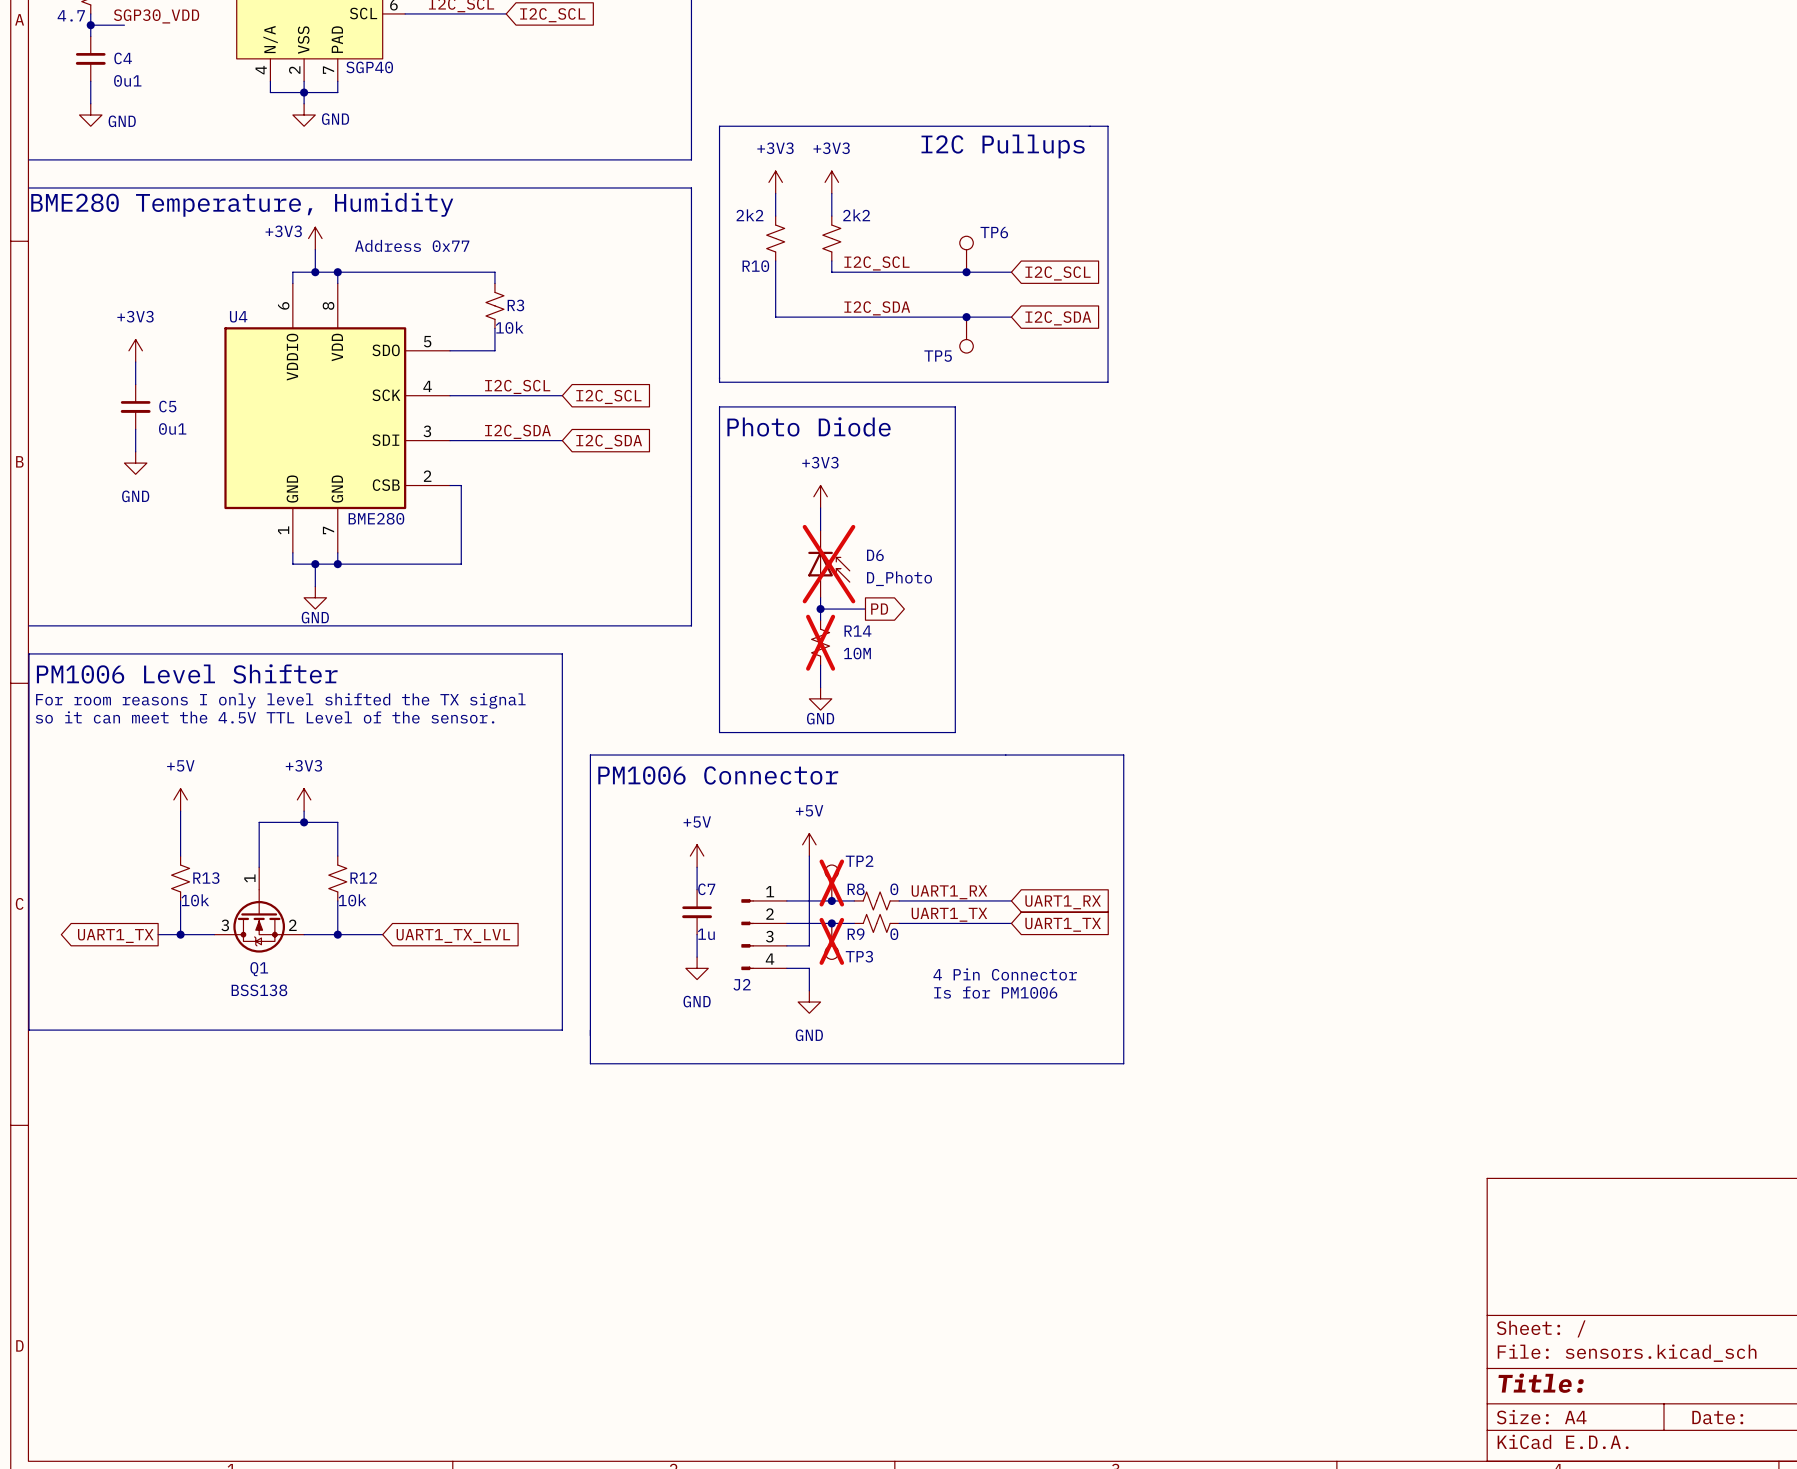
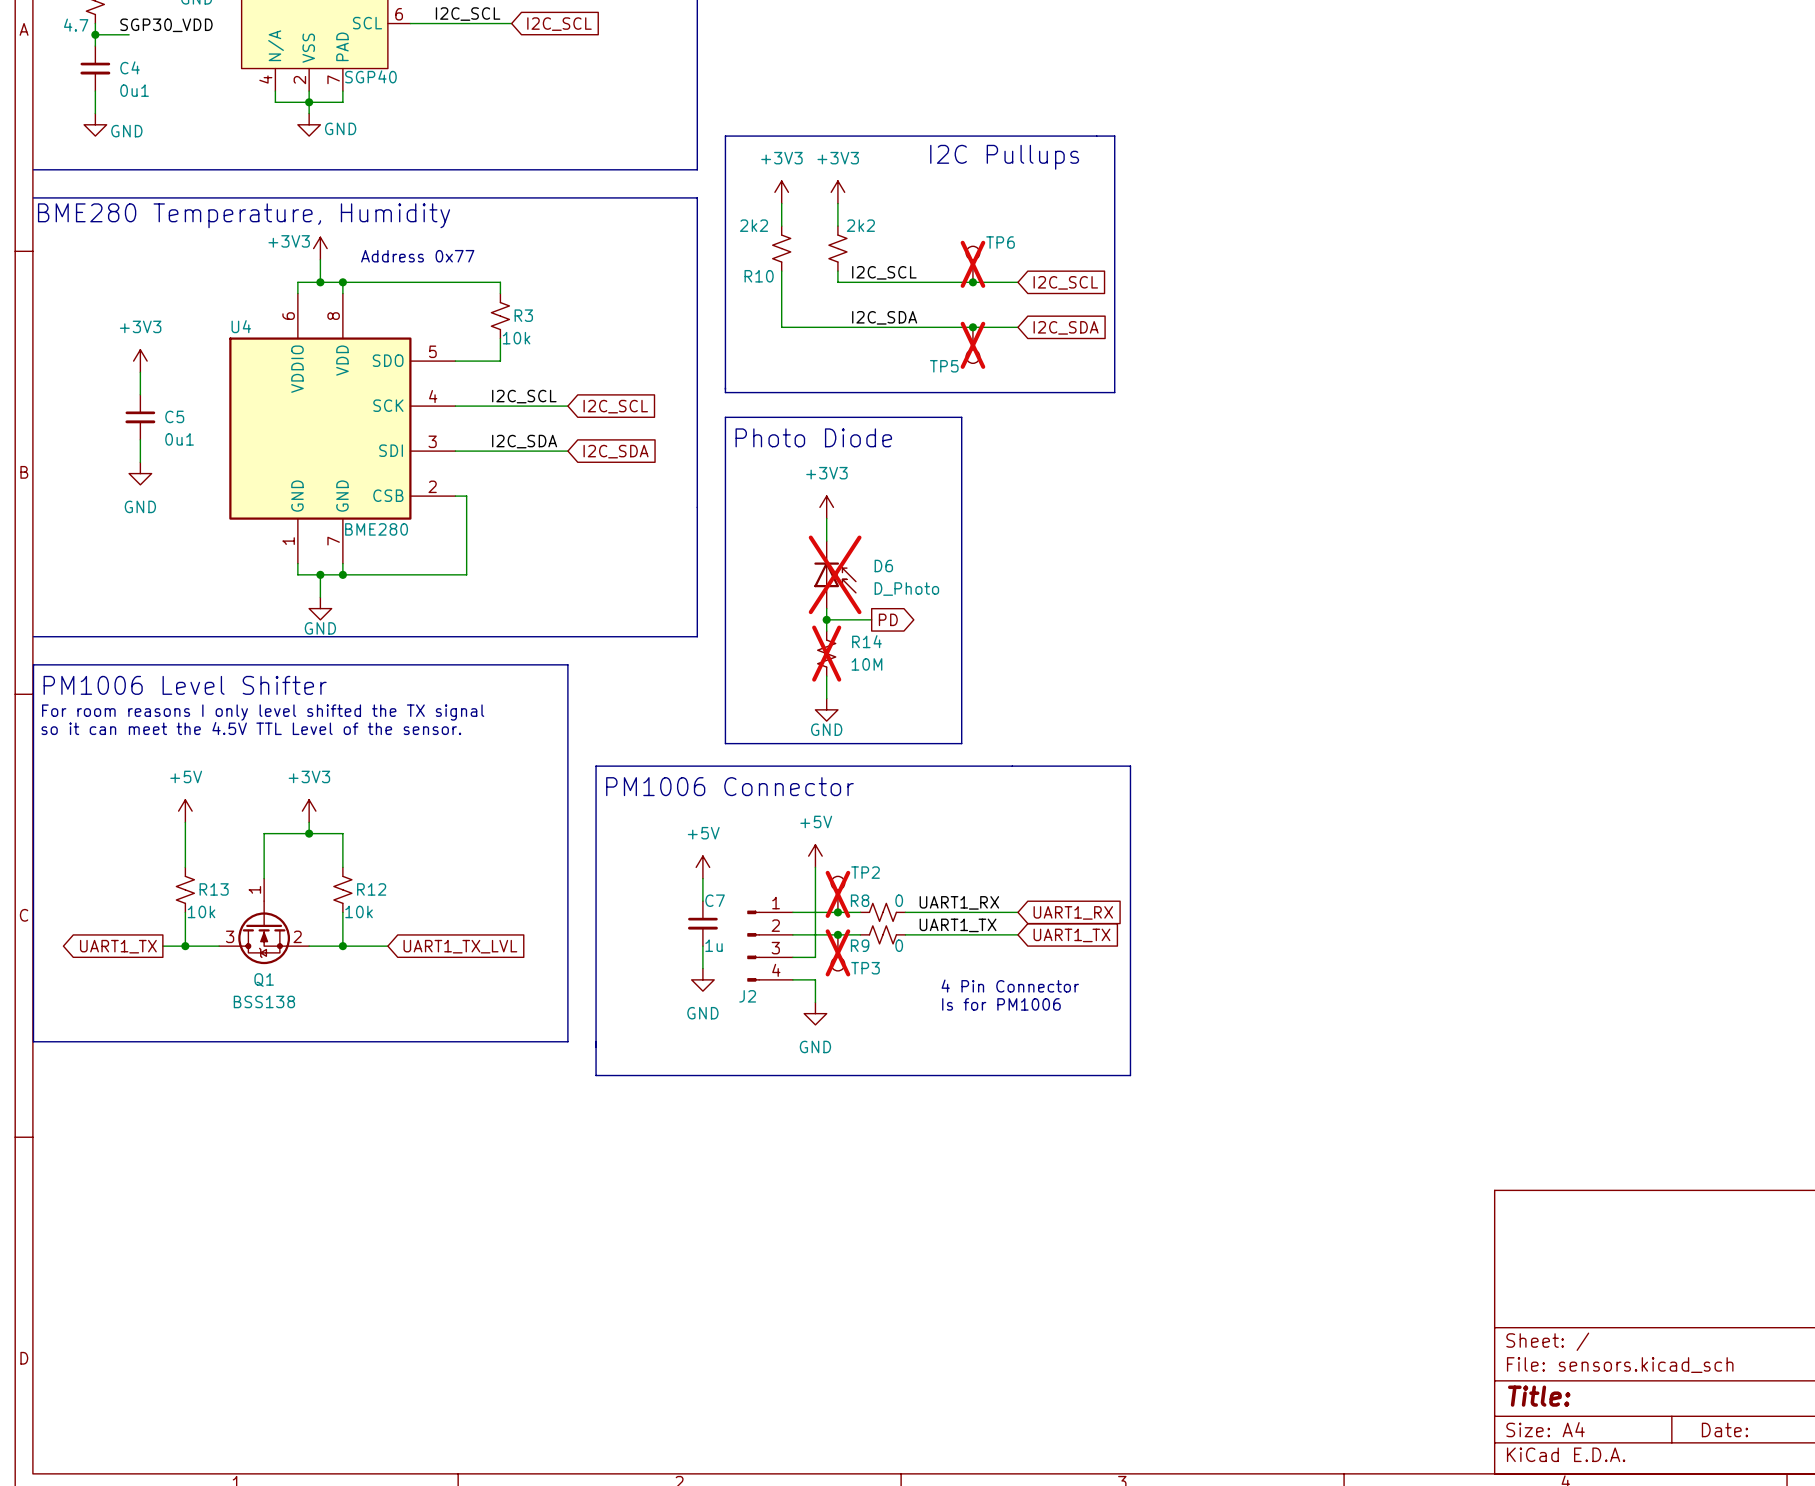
TP6 do-not-place cross: none -> (972, 264)
TP5 do-not-place cross: none -> (972, 345)

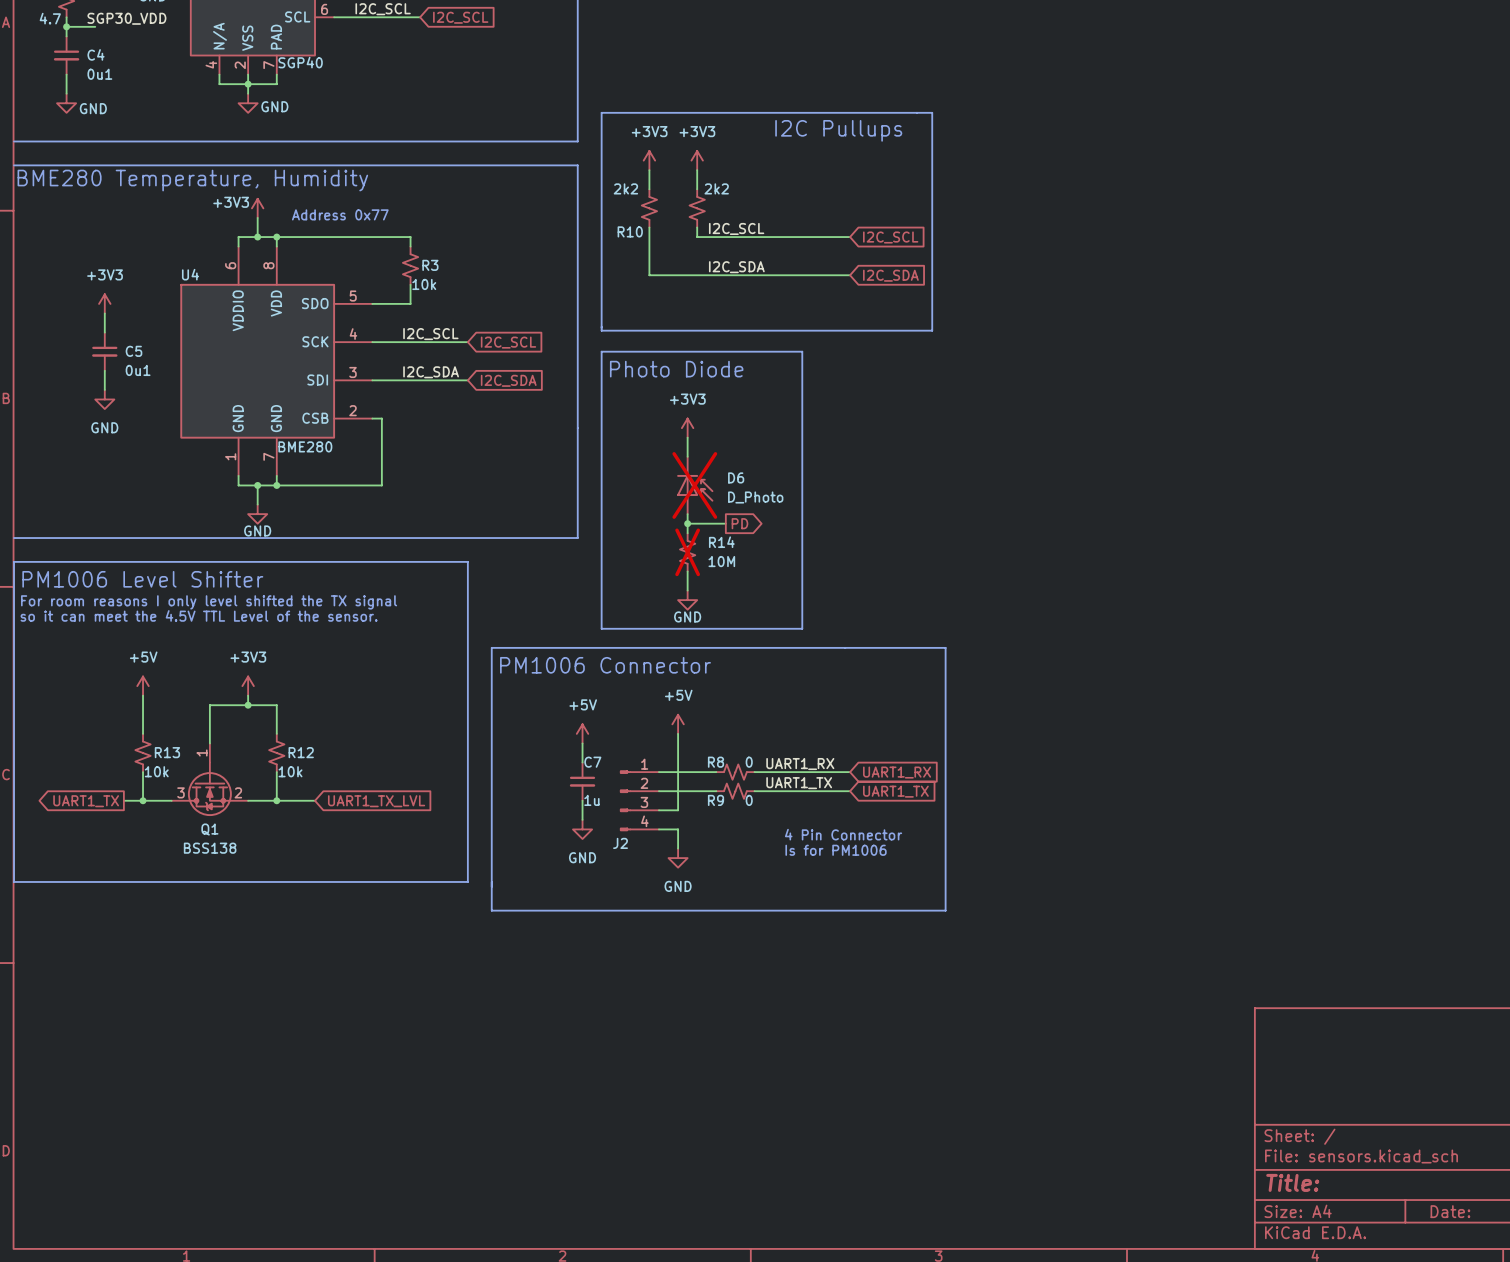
TP6: (972, 264) -> none
junction: (972, 282) -> none
junction: (972, 327) -> none
TP5: (972, 345) -> none
TP2: (837, 894) -> none
junction: (837, 912) -> none
junction: (837, 934) -> none
TP3: (837, 952) -> none

